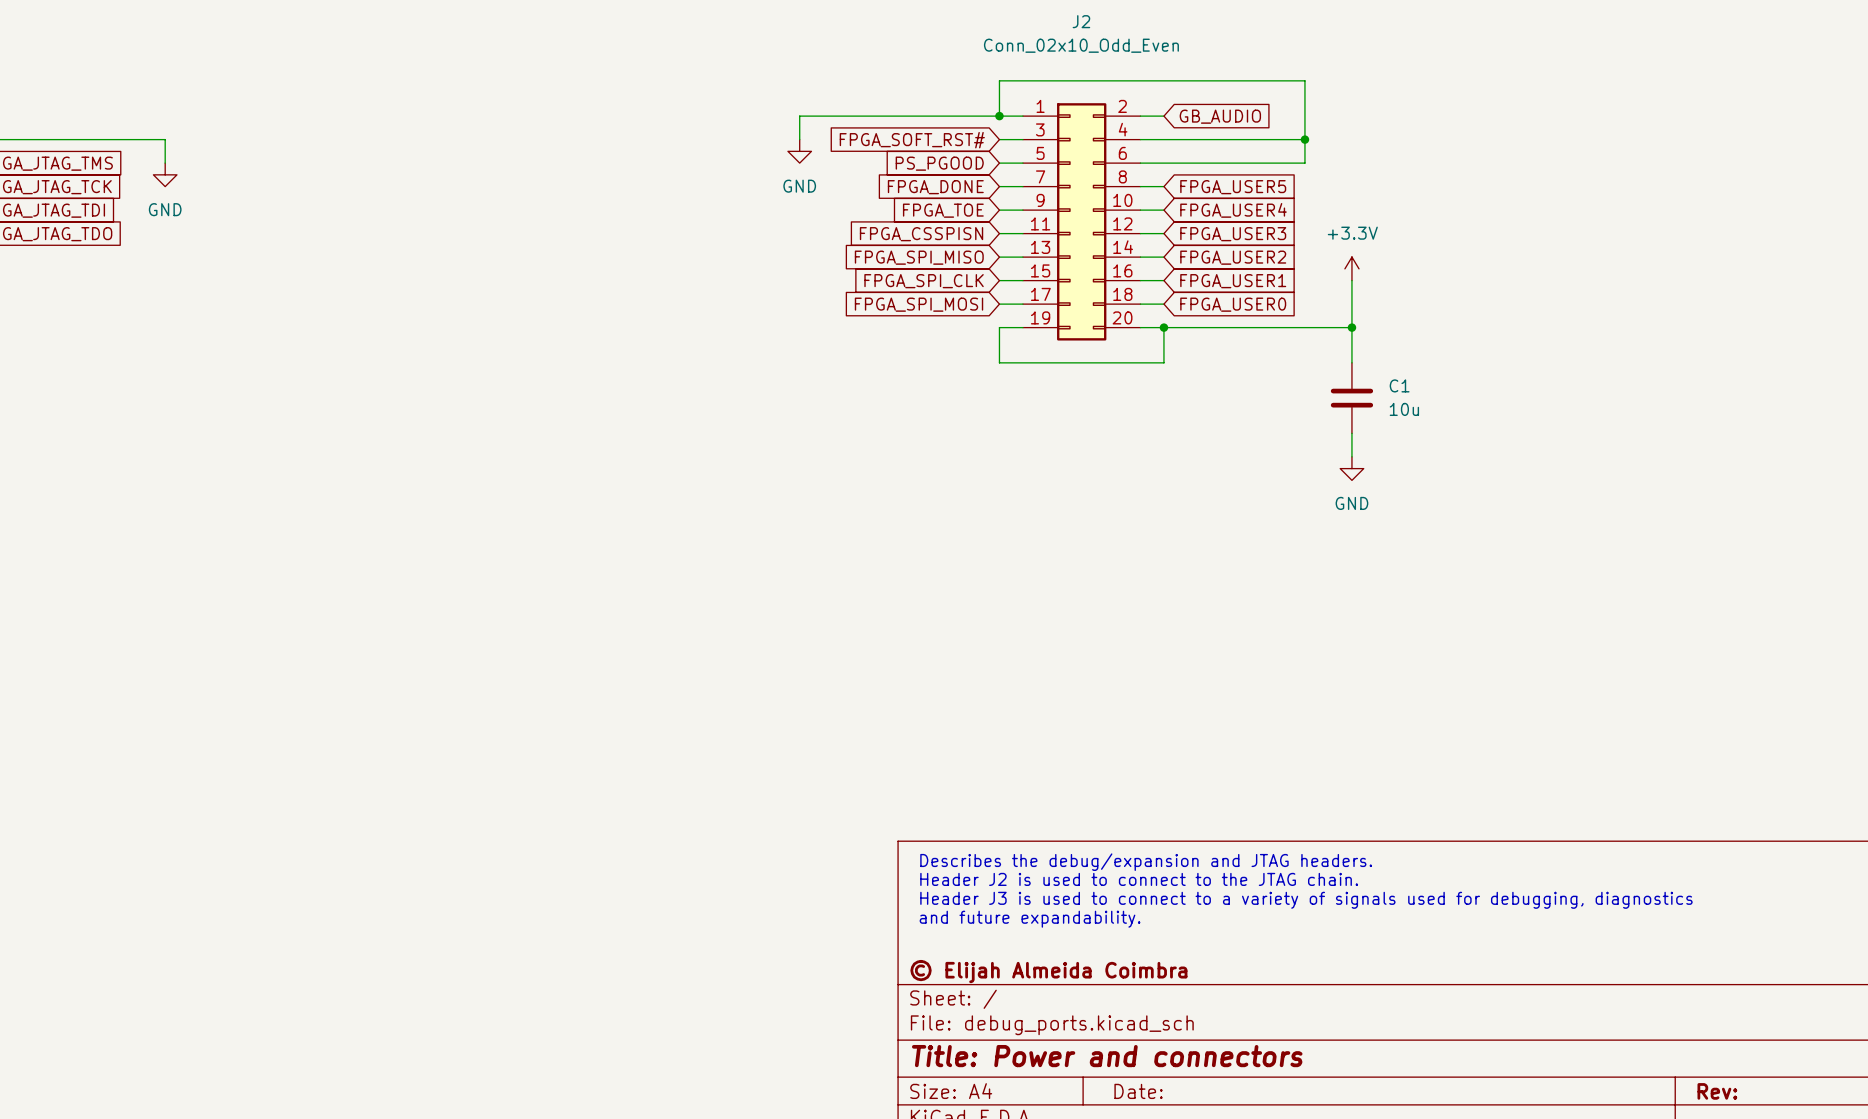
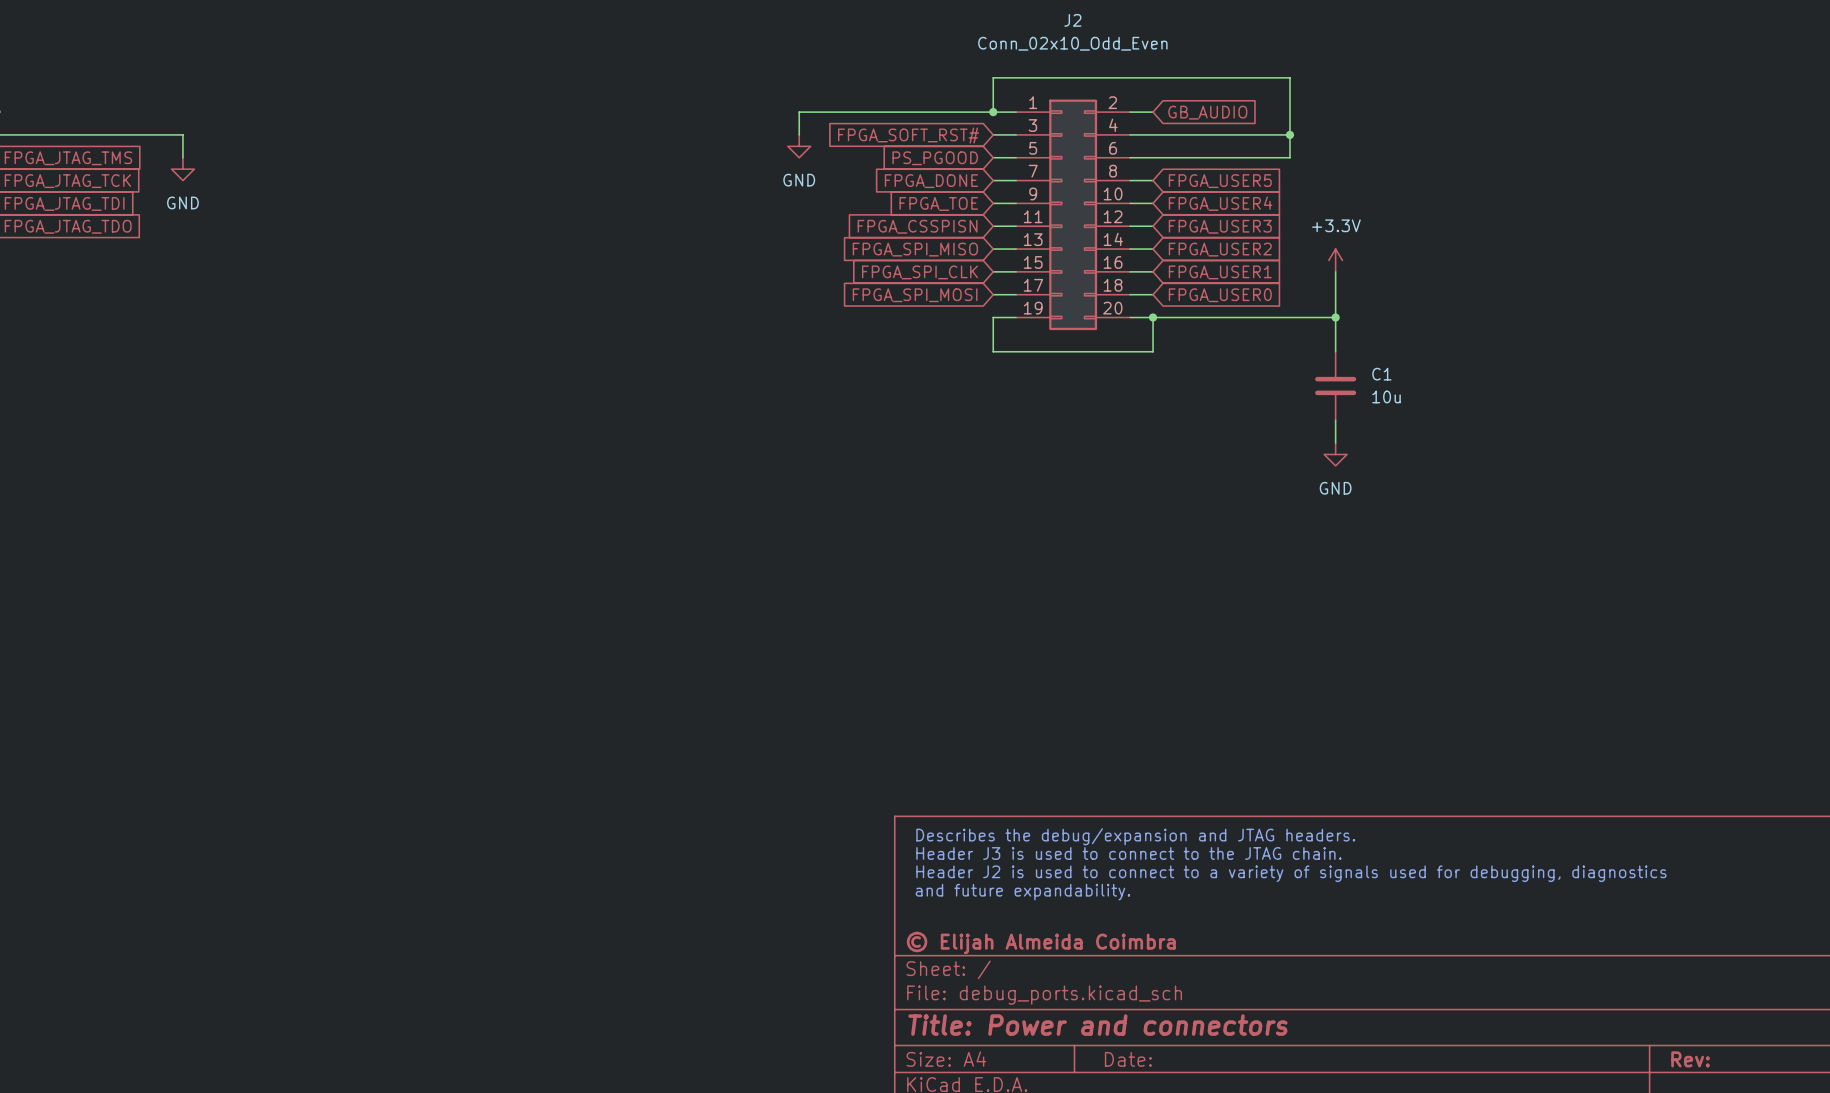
text: Header J2 is used to connect to the JTAG chain. (1139, 879) -> Header J3 is used to connect to the JTAG chain. (1128, 853)
text: Header J3 is used to connect to a variety of signals used for debugging, diagnostics (1306, 900) -> Header J2 is used to connect to a variety of signals used for debugging, diagnostics (1291, 873)

